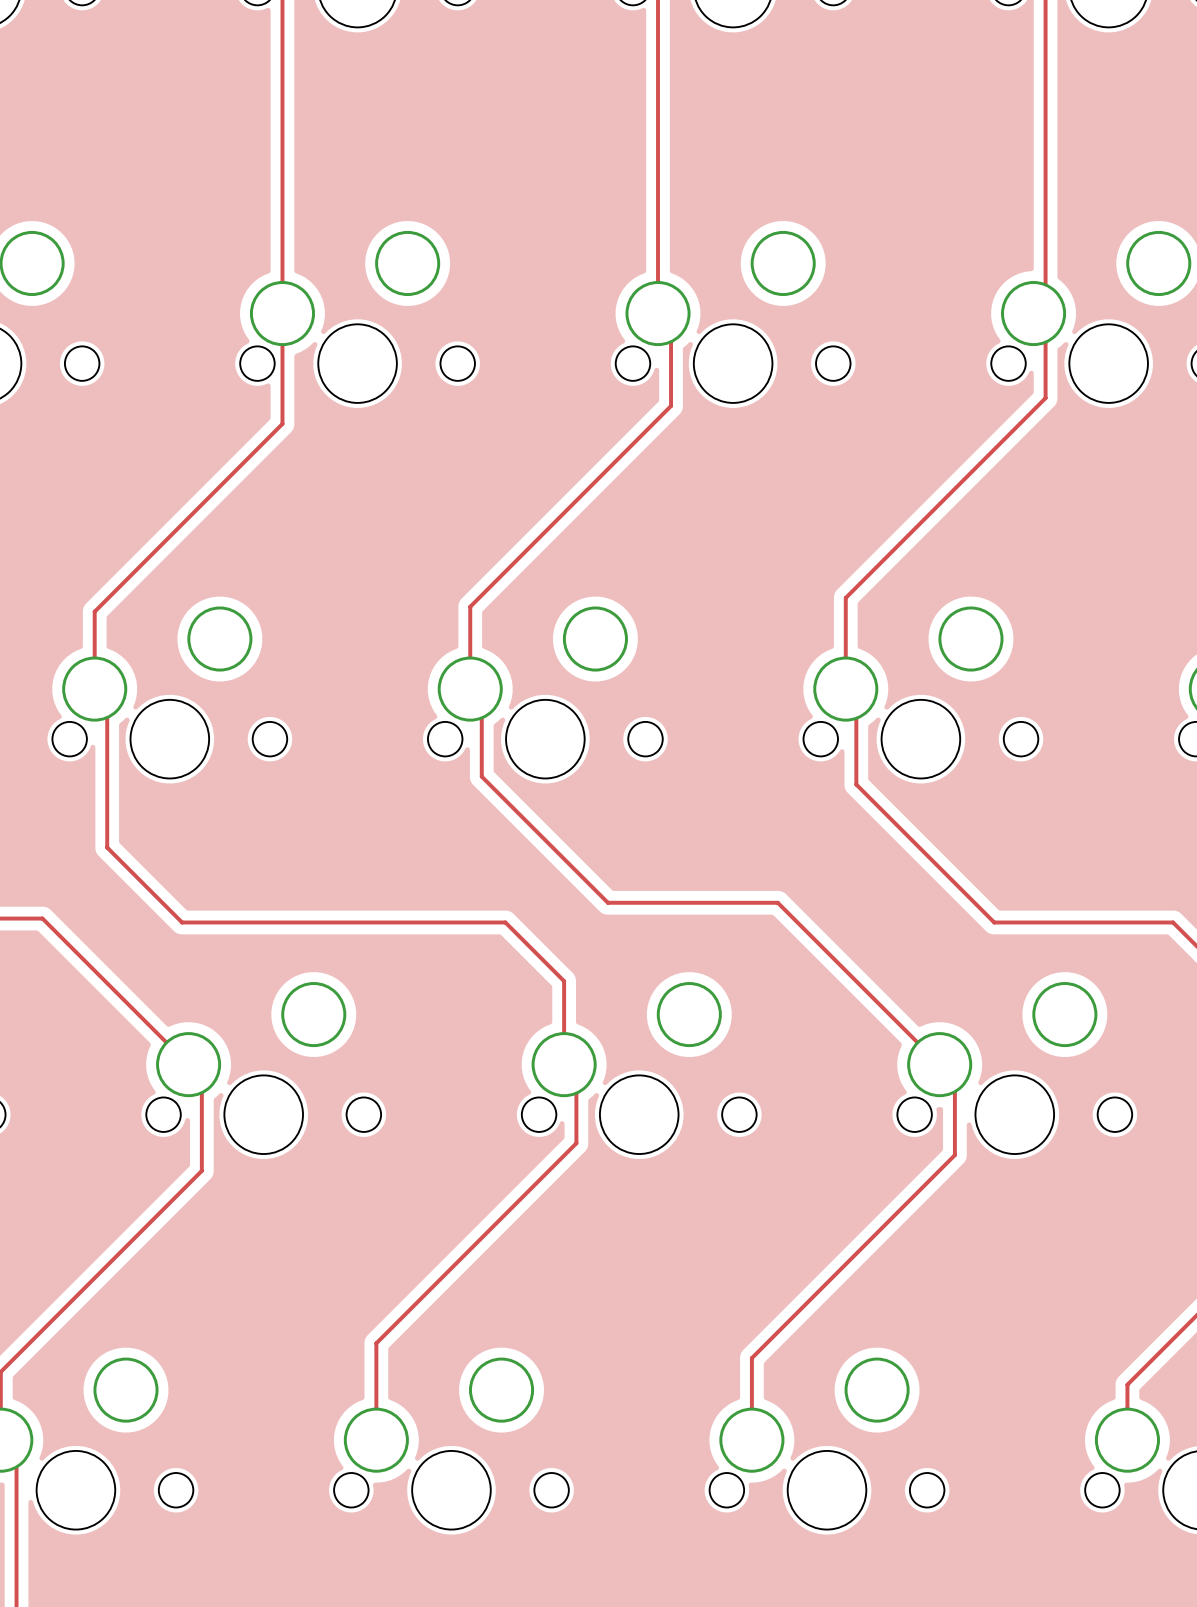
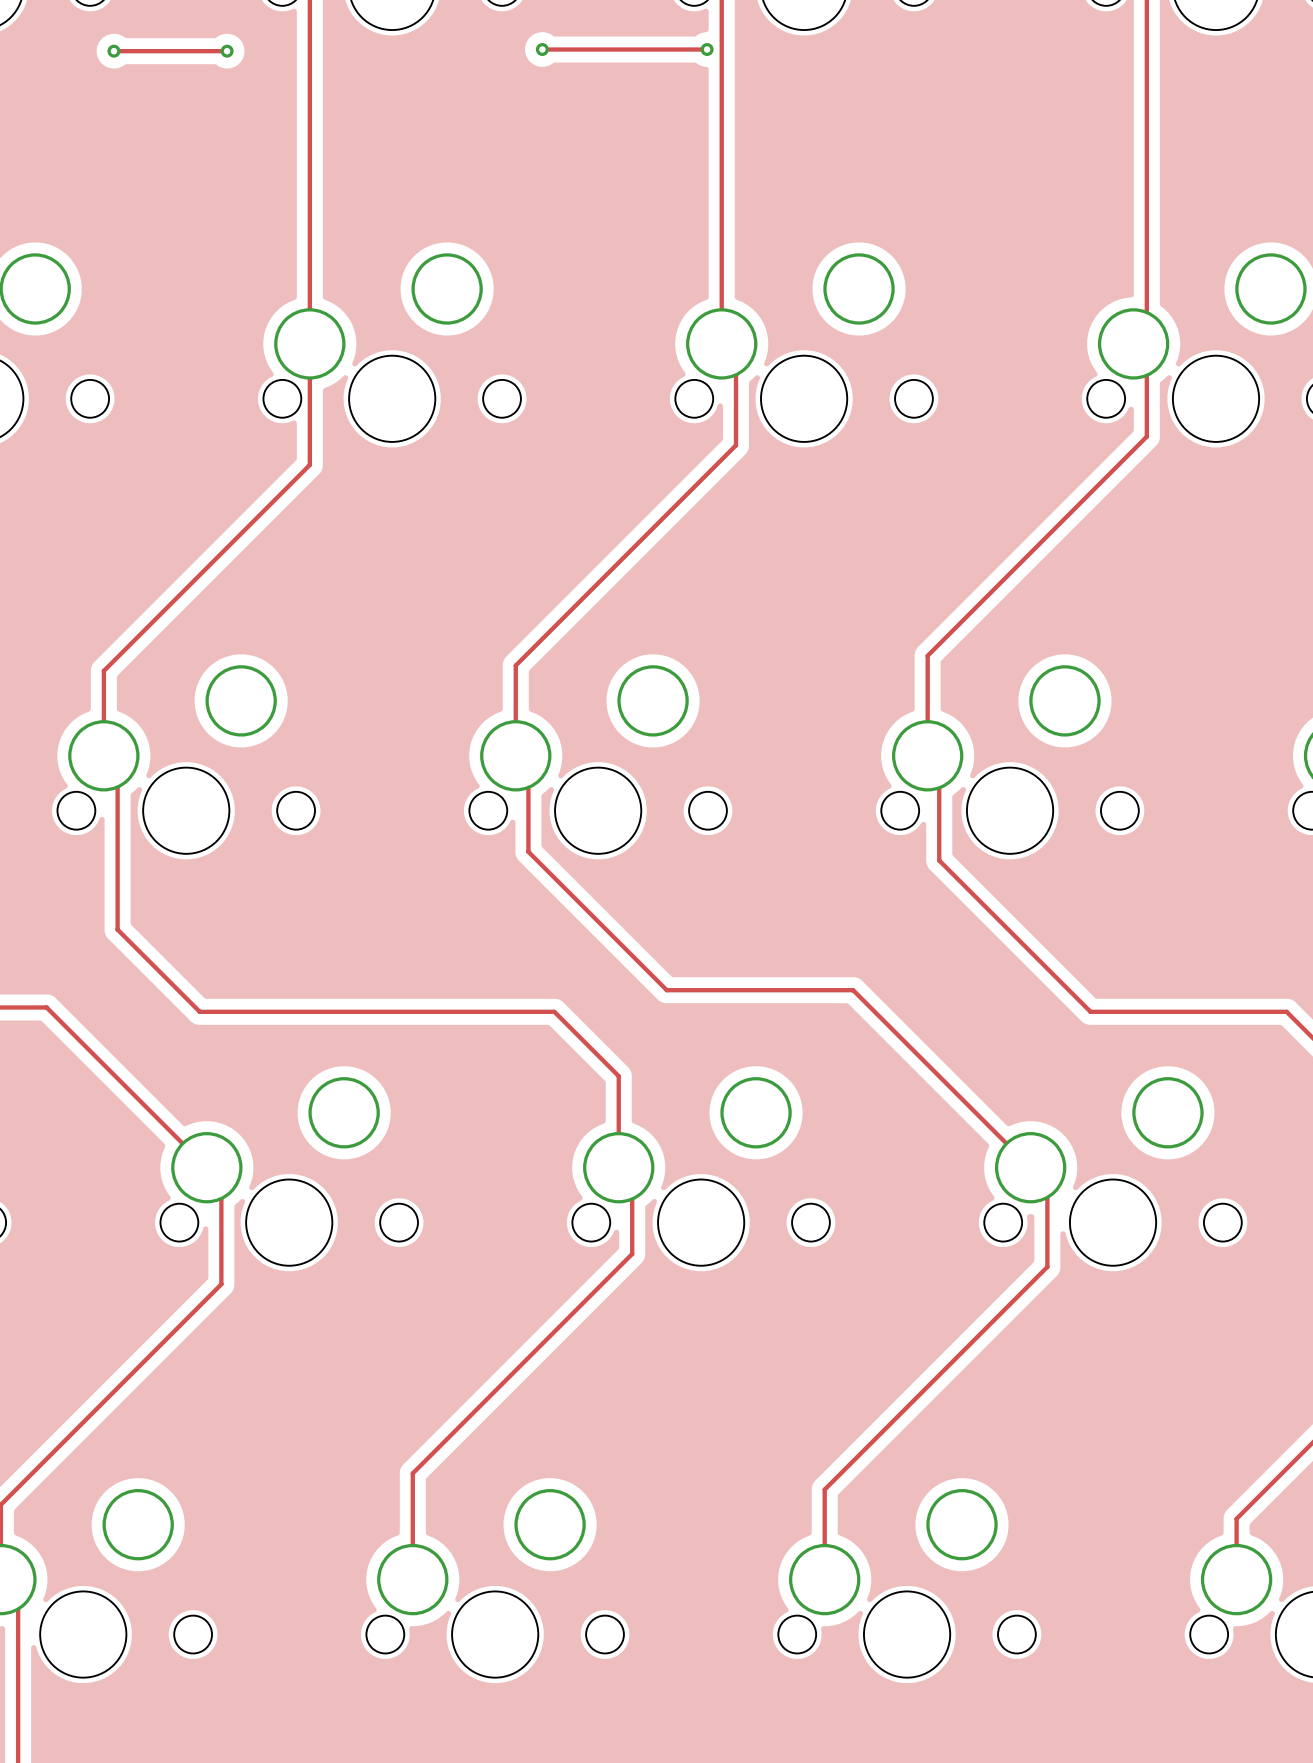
track: none -> (542, 49) (707, 49)
via: none -> (542, 49)
via: none -> (707, 49)
track: none -> (113, 51) (227, 51)
via: none -> (113, 51)
via: none -> (227, 51)

